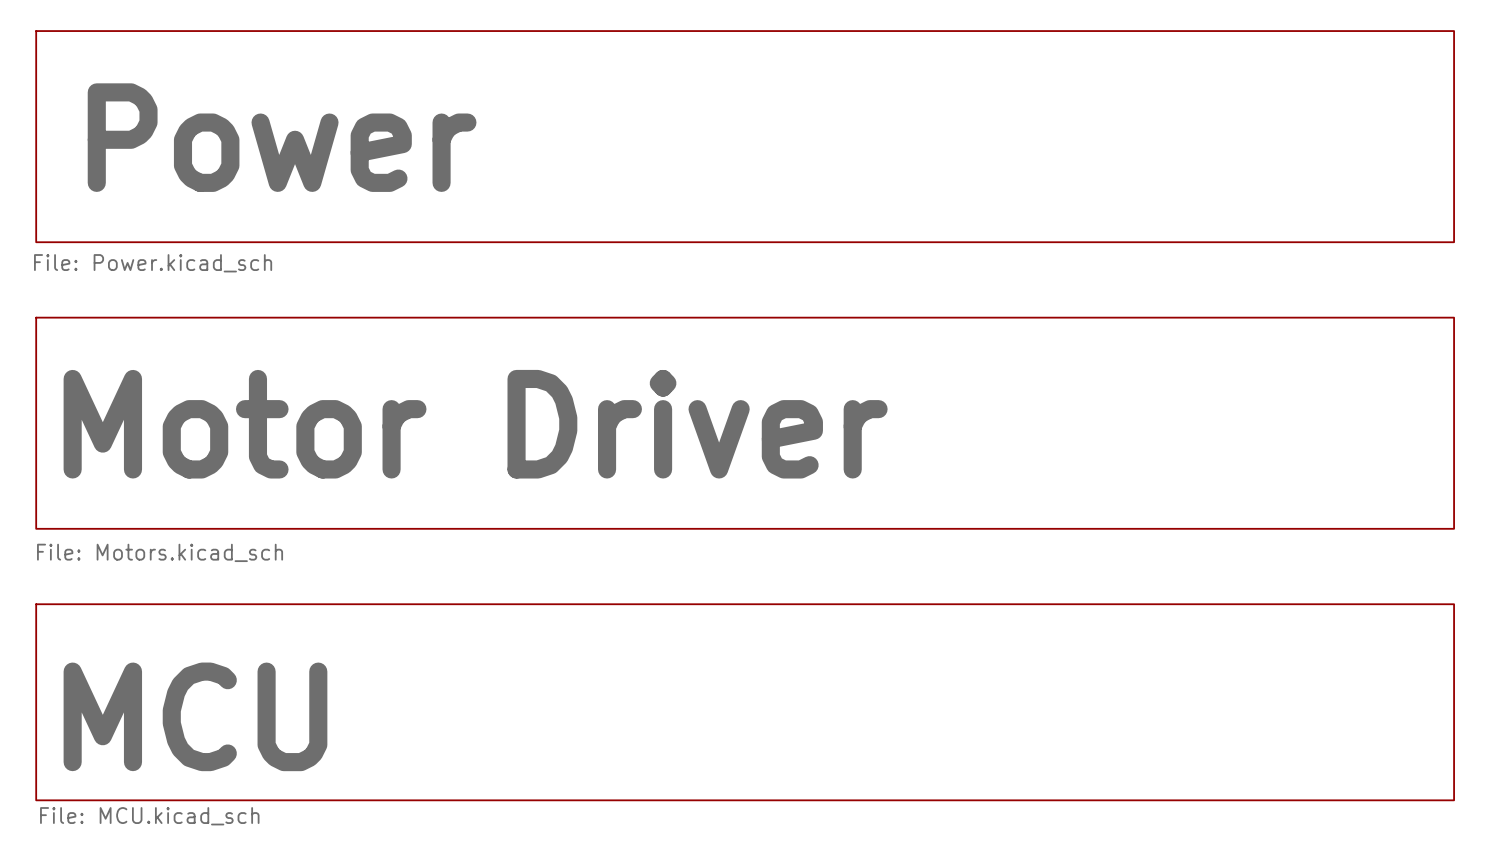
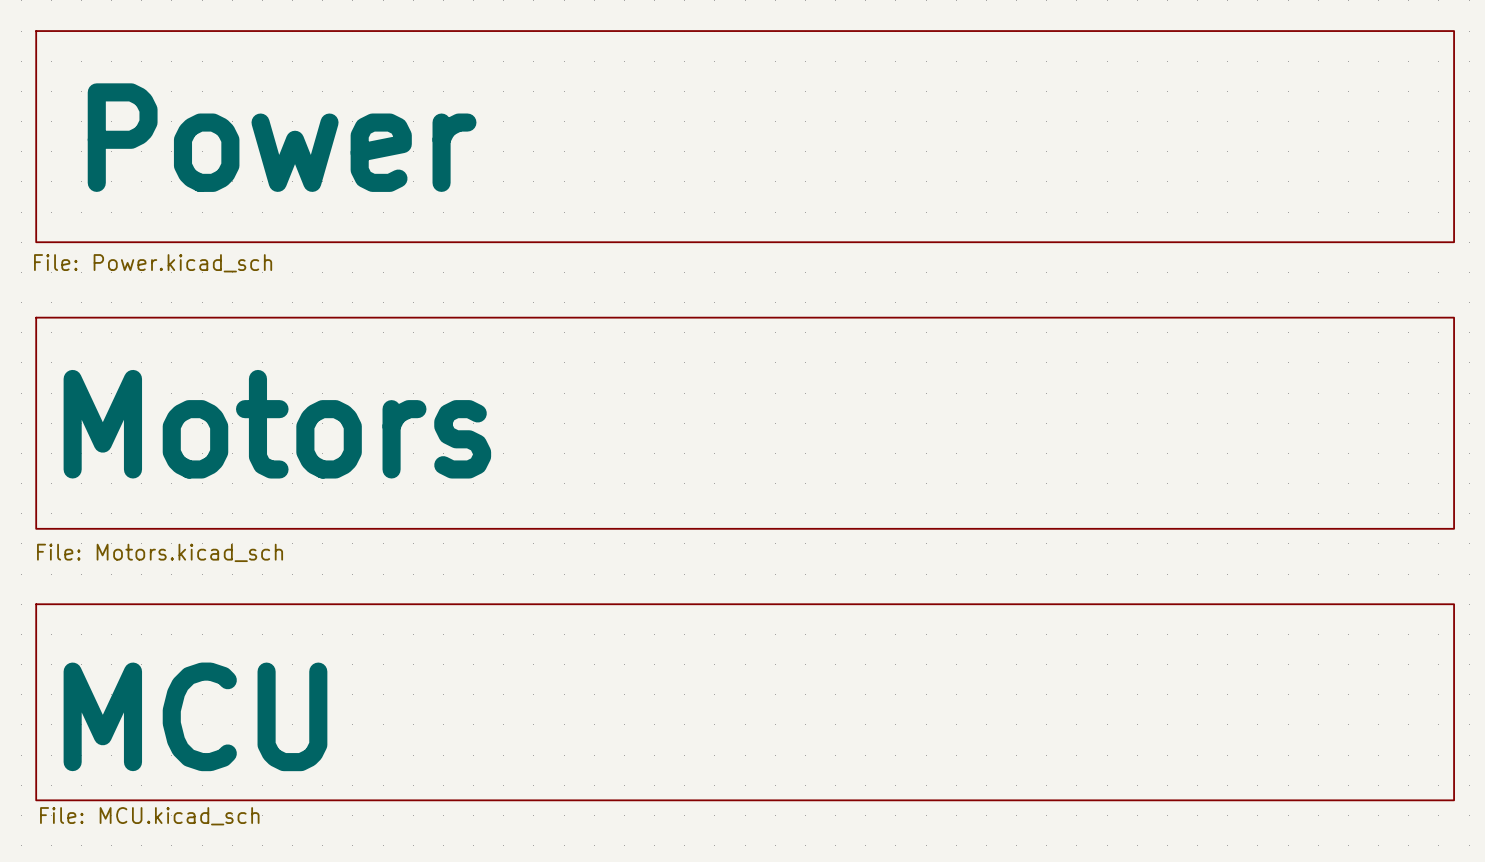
sheet Motor Driver name: Motor Driver (475, 424) -> Motors (277, 424)

